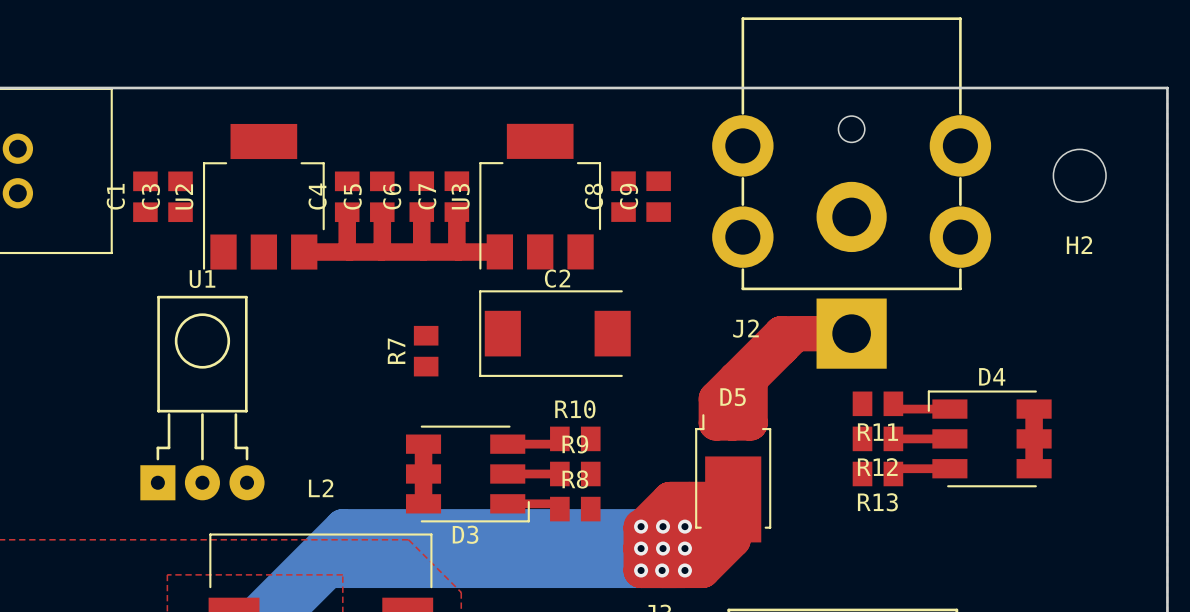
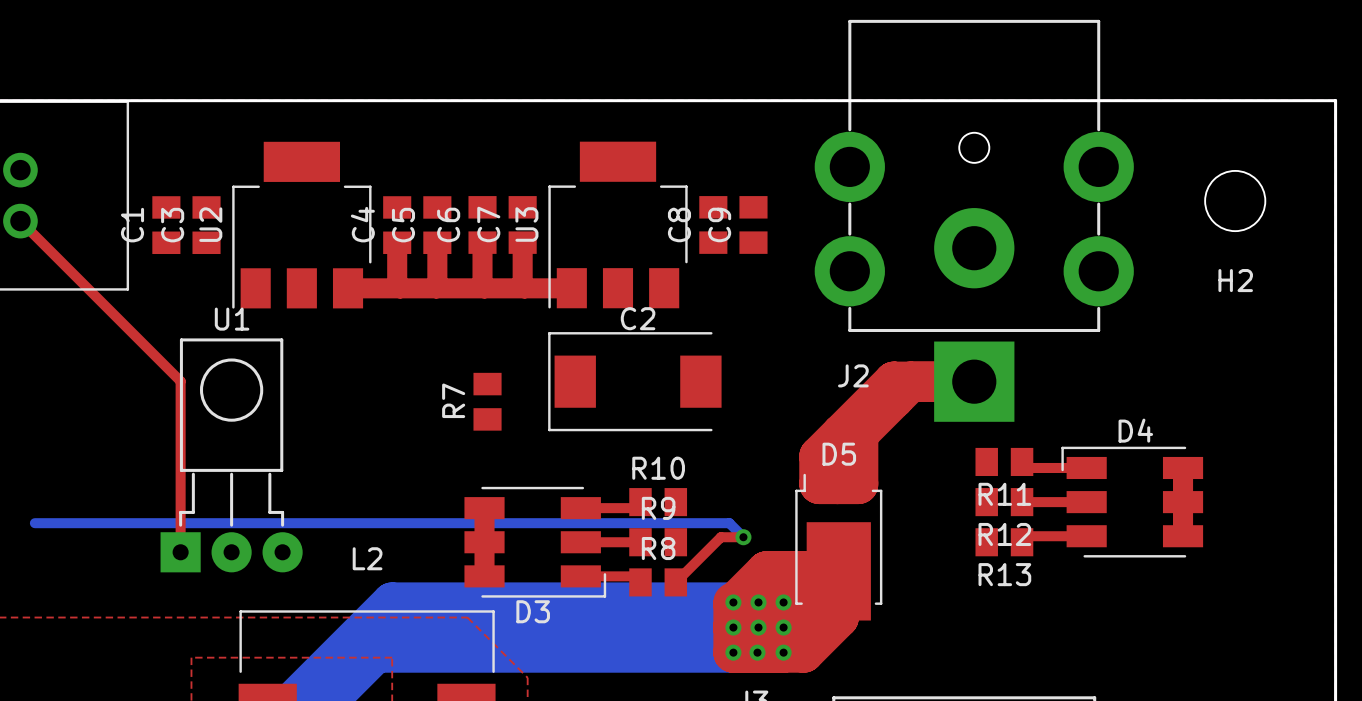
top track: none -> (20, 221) (180, 381) (180, 552)
bottom track: none -> (34, 523) (729, 523) (743, 537)
top track: none -> (743, 537) (720, 537) (675, 582)
via: none -> (743, 537)

